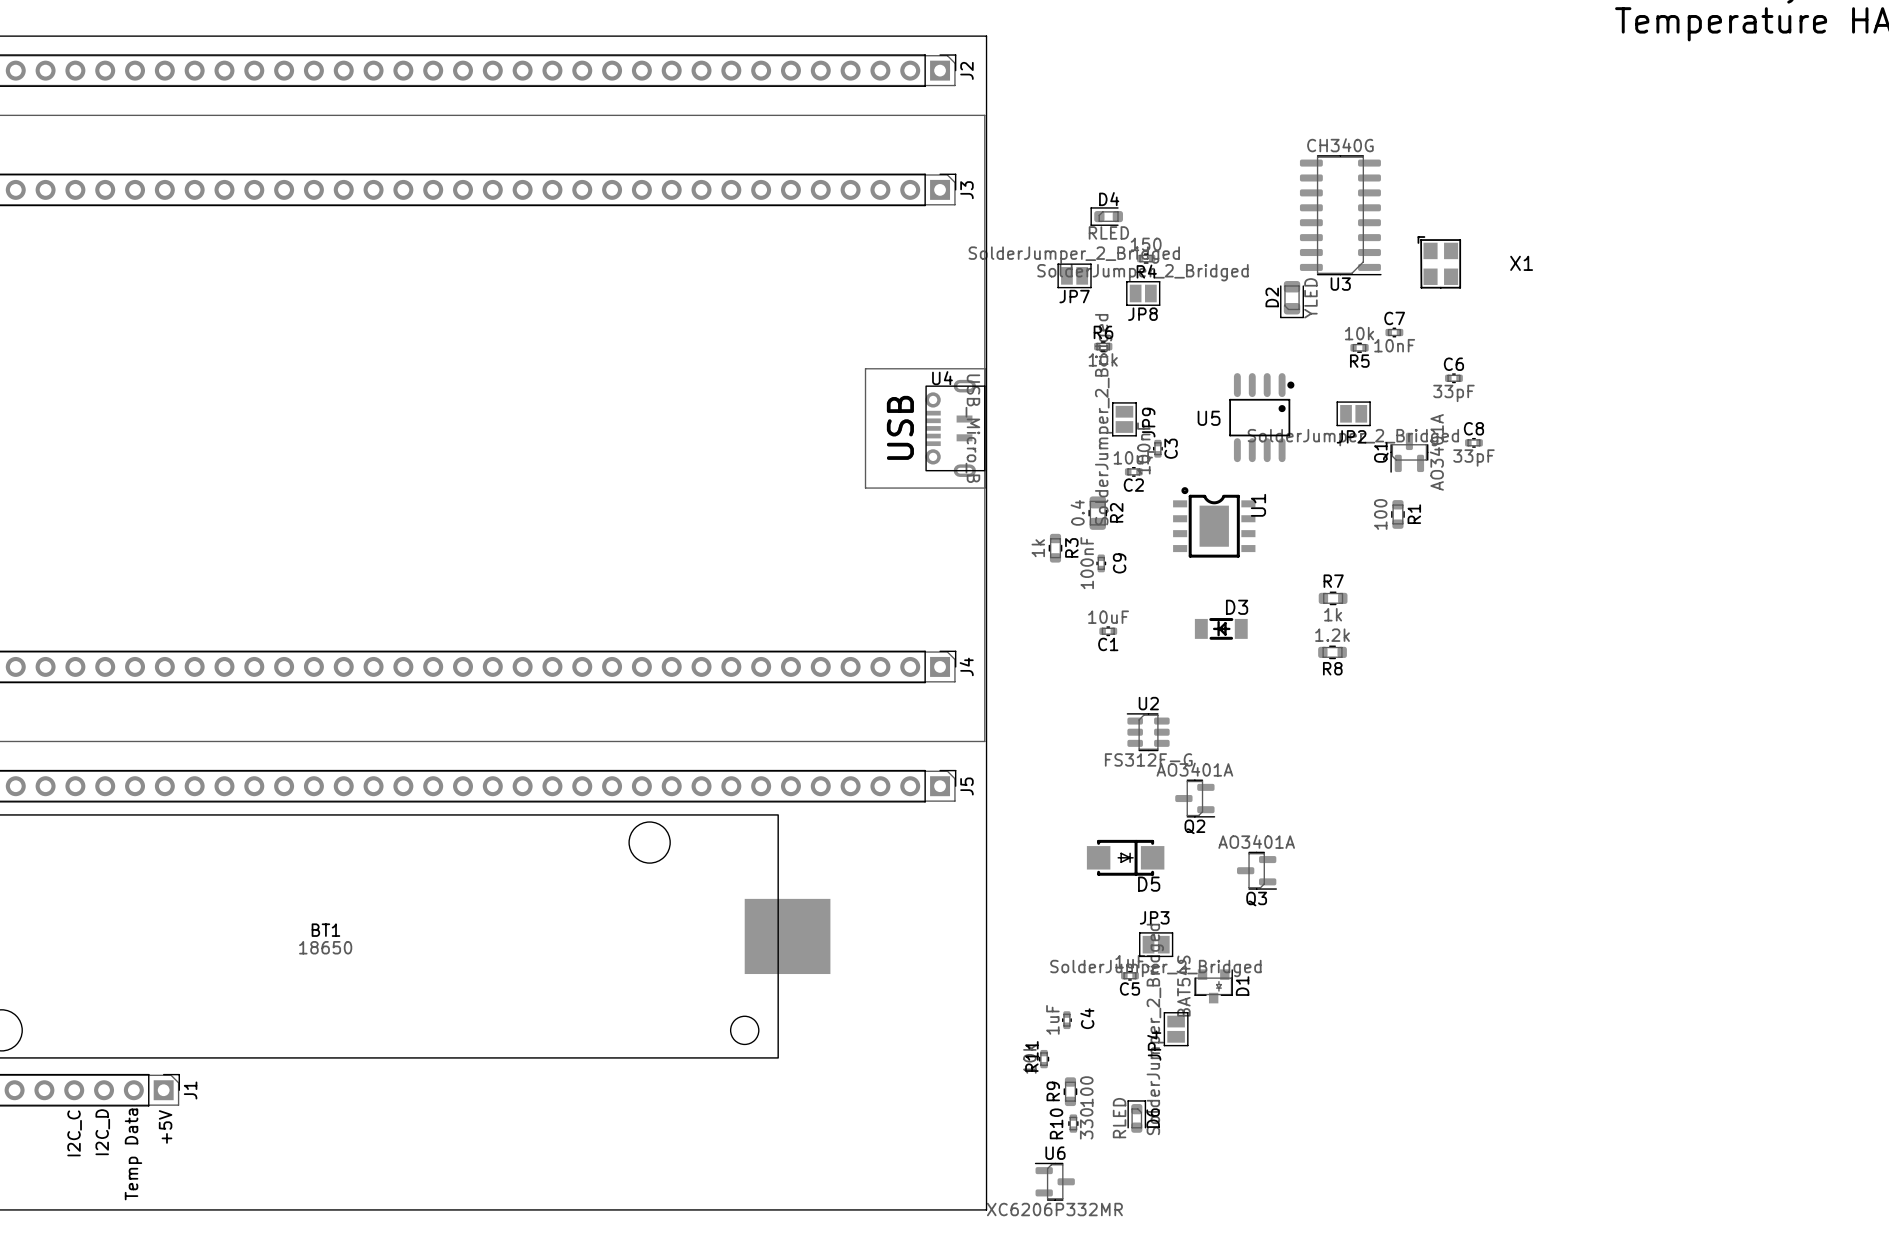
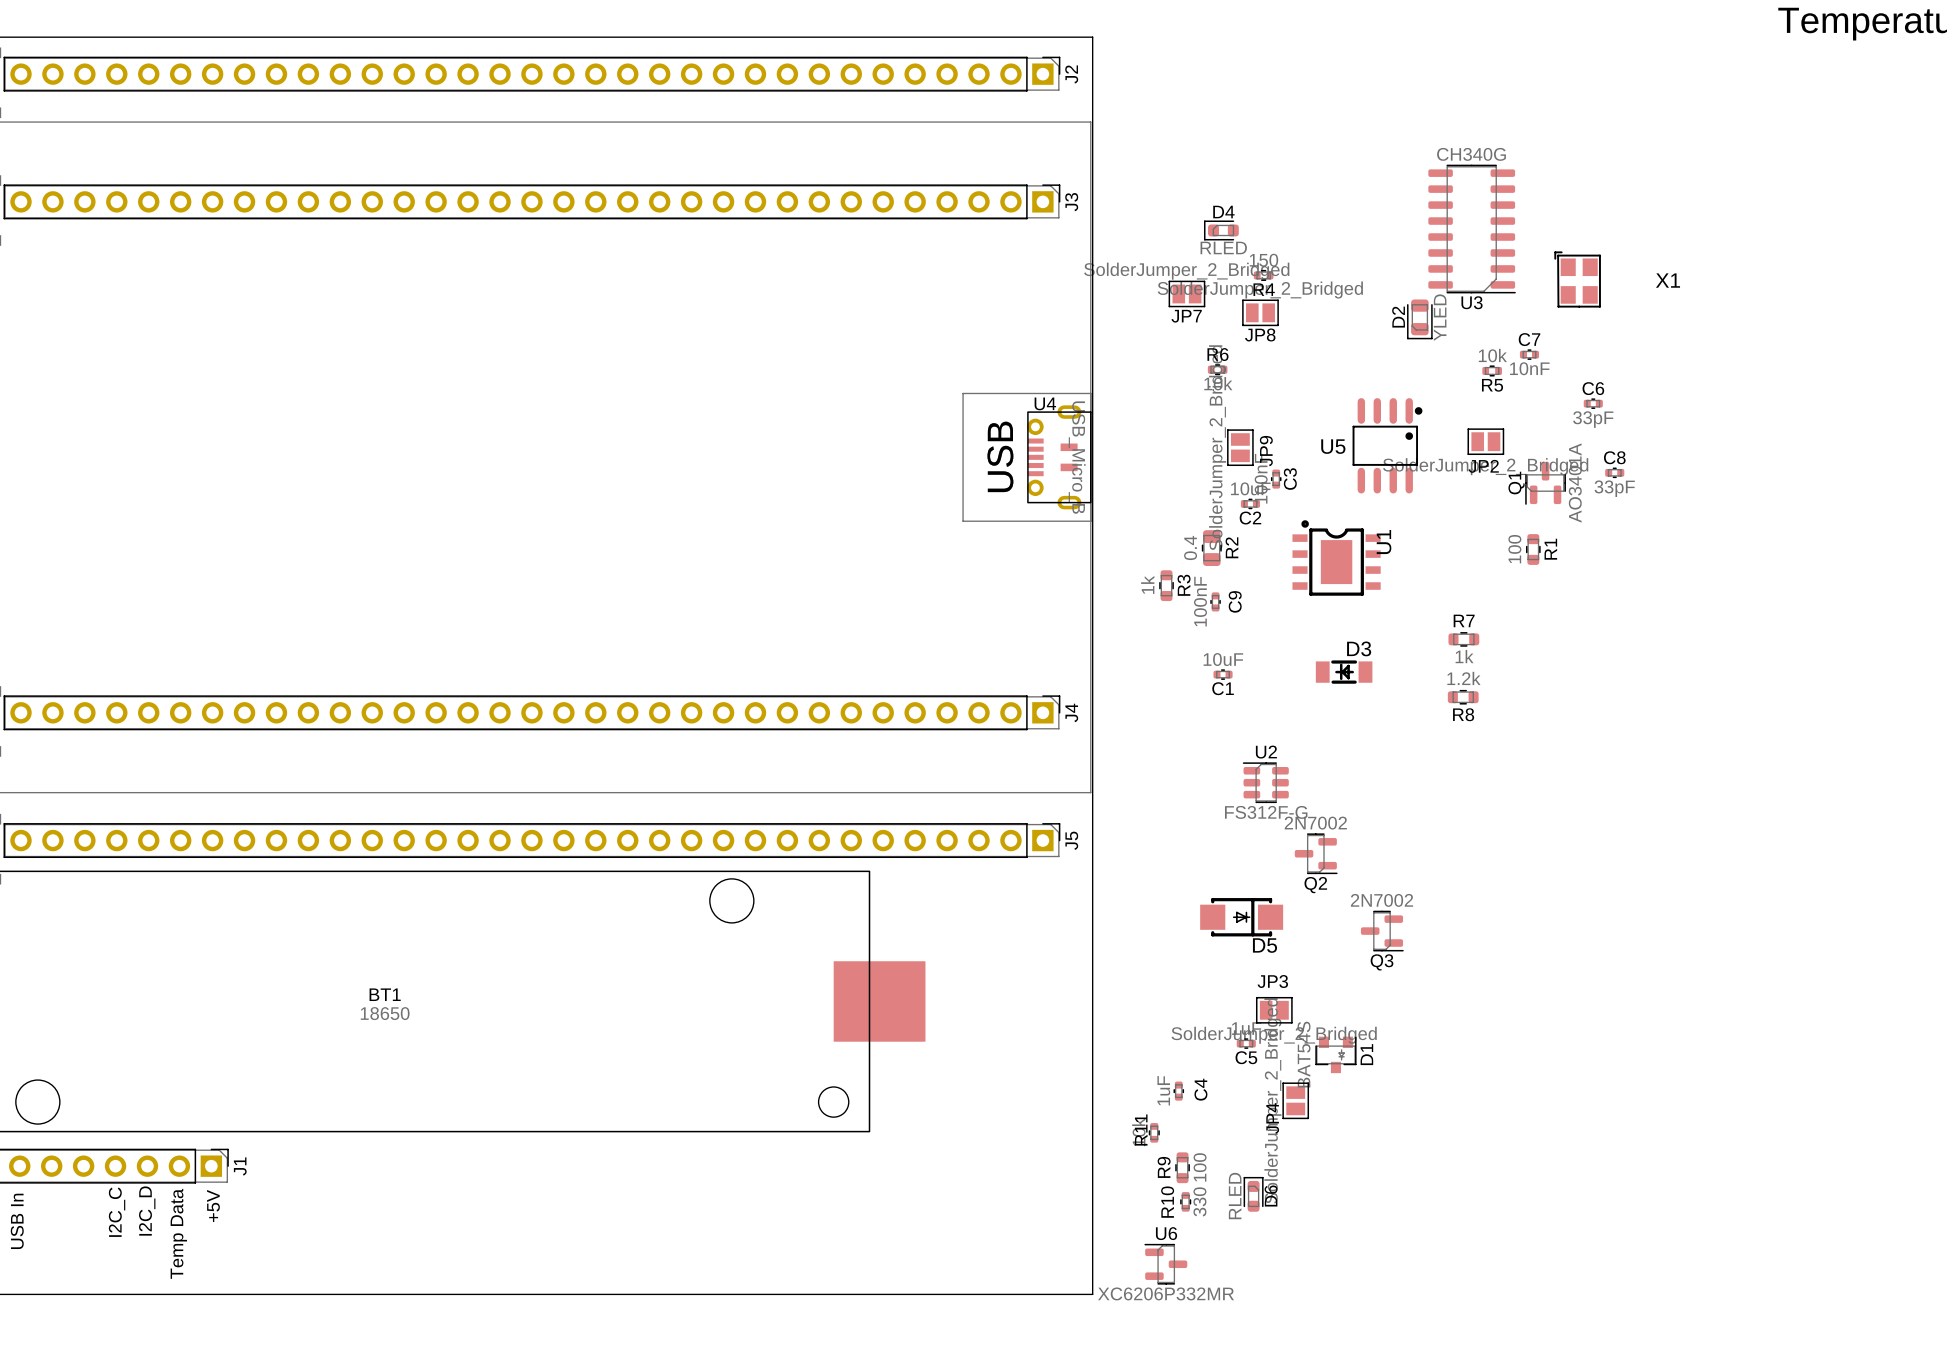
Q2 value: AO3401A (1194, 769) -> 2N7002 (1315, 823)
Q3 value: AO3401A (1256, 841) -> 2N7002 (1381, 900)

